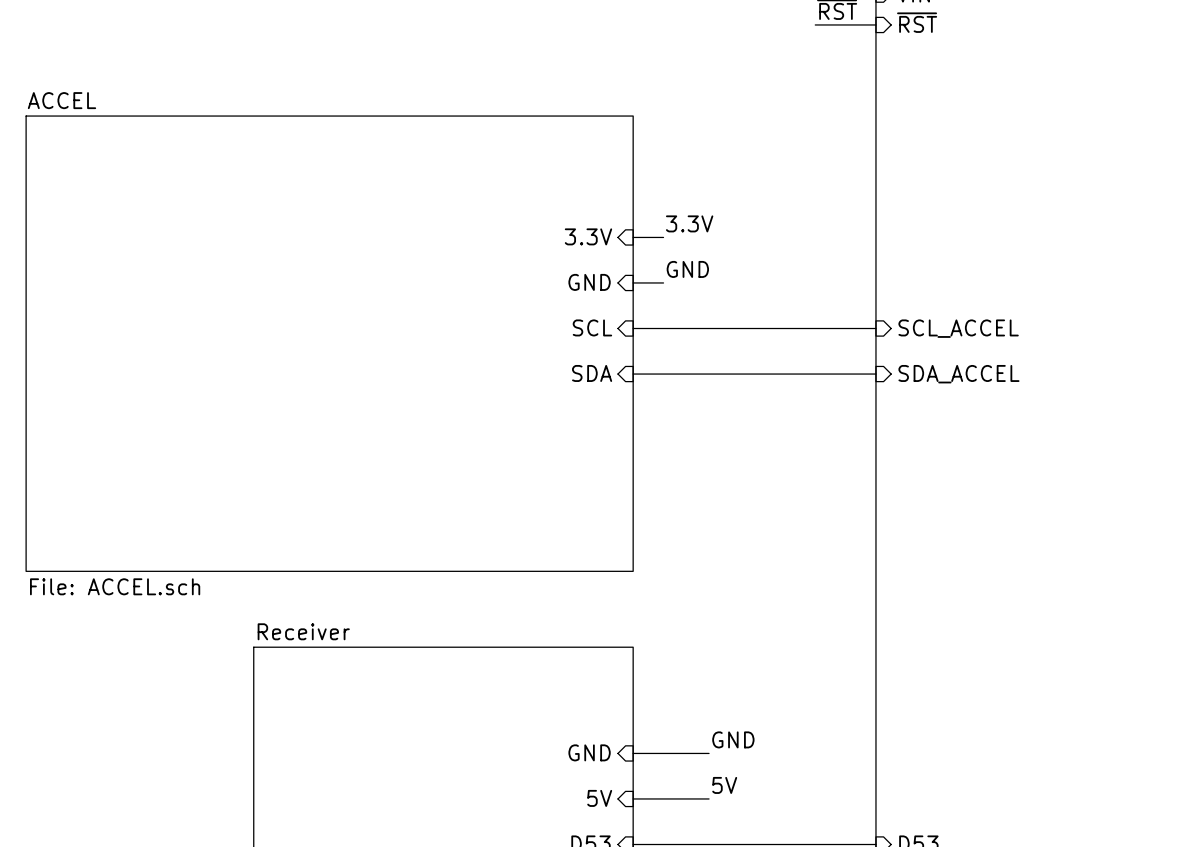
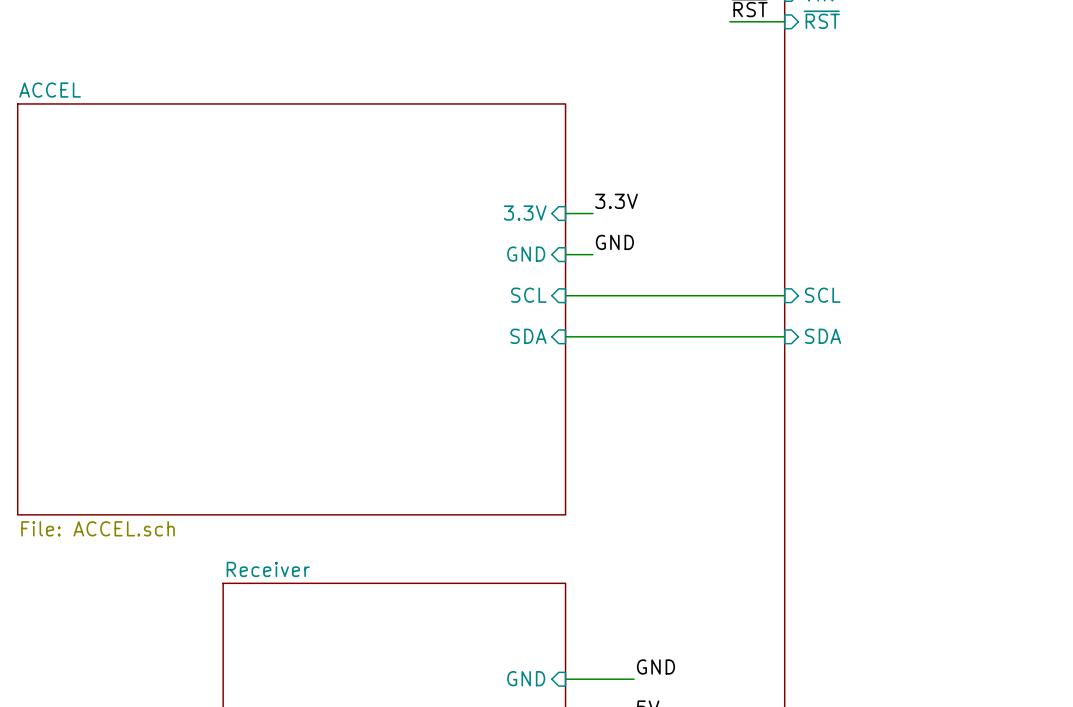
sheet pin: SCL_ACCEL (958, 328) -> SCL (822, 295)
sheet pin: SDA_ACCEL (958, 374) -> SDA (823, 336)

